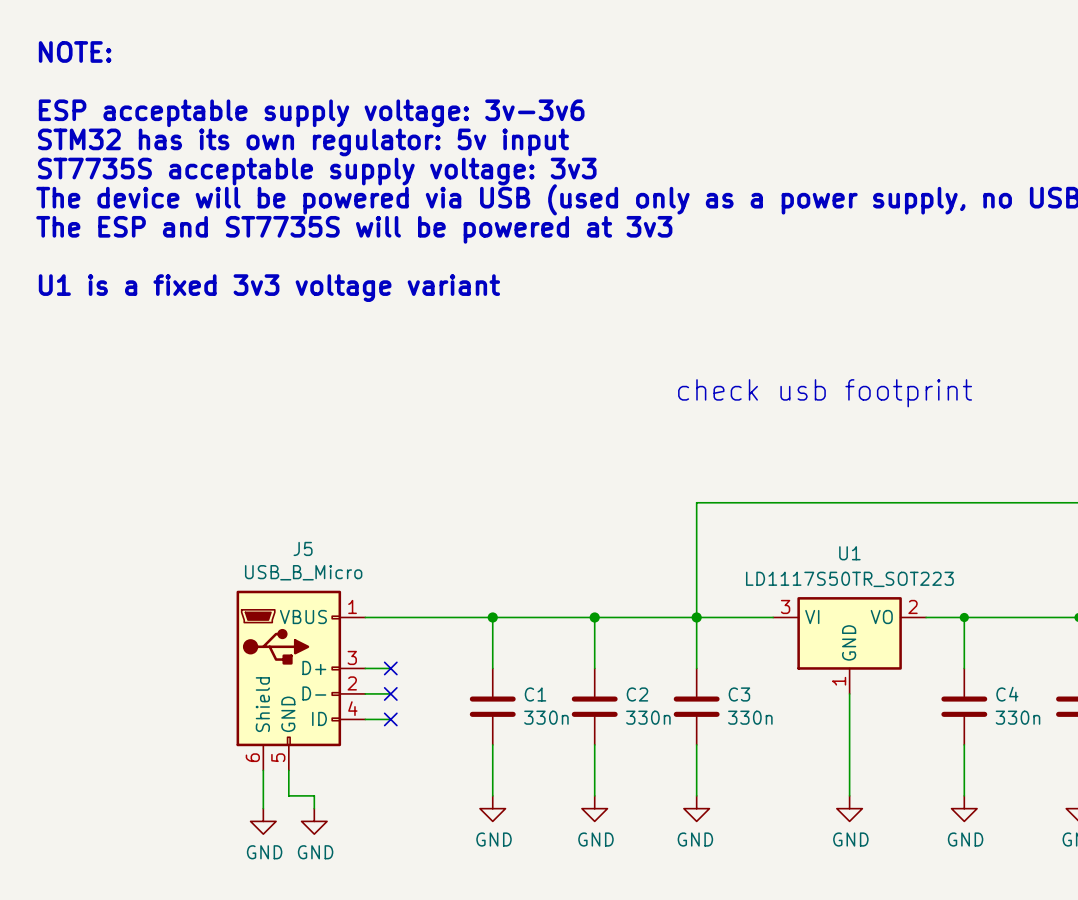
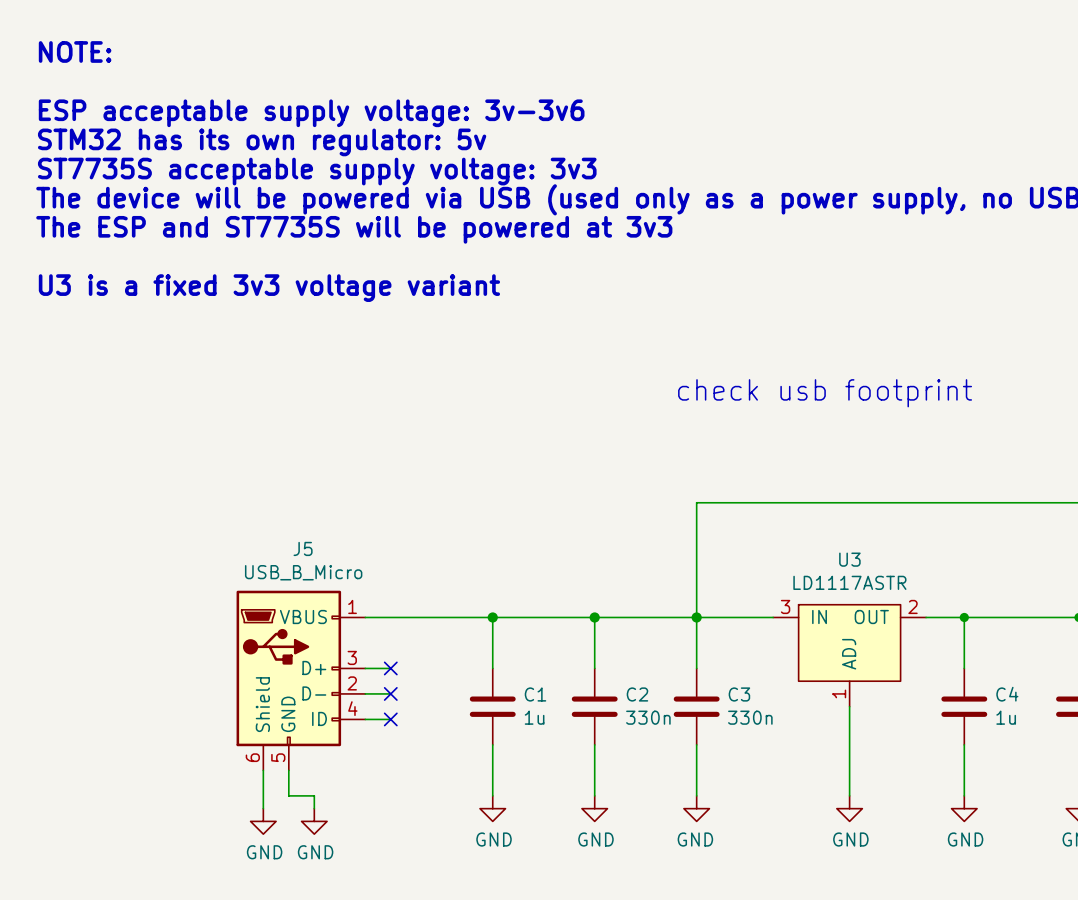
text: STM32 has its own regulator: 5v input (303, 142) -> STM32 has its own regulator: 5v (262, 142)
text: U1 is a fixed 3v3 voltage variant (269, 288) -> U3 is a fixed 3v3 voltage variant (269, 288)
U1: LD1117S50TR_SOT223 (849, 645) -> none
U3: none -> LD1117ASTR (849, 655)
C1 value: 330n (546, 717) -> 1u (534, 717)
C4 value: 330n (1017, 717) -> 1u (1006, 717)

